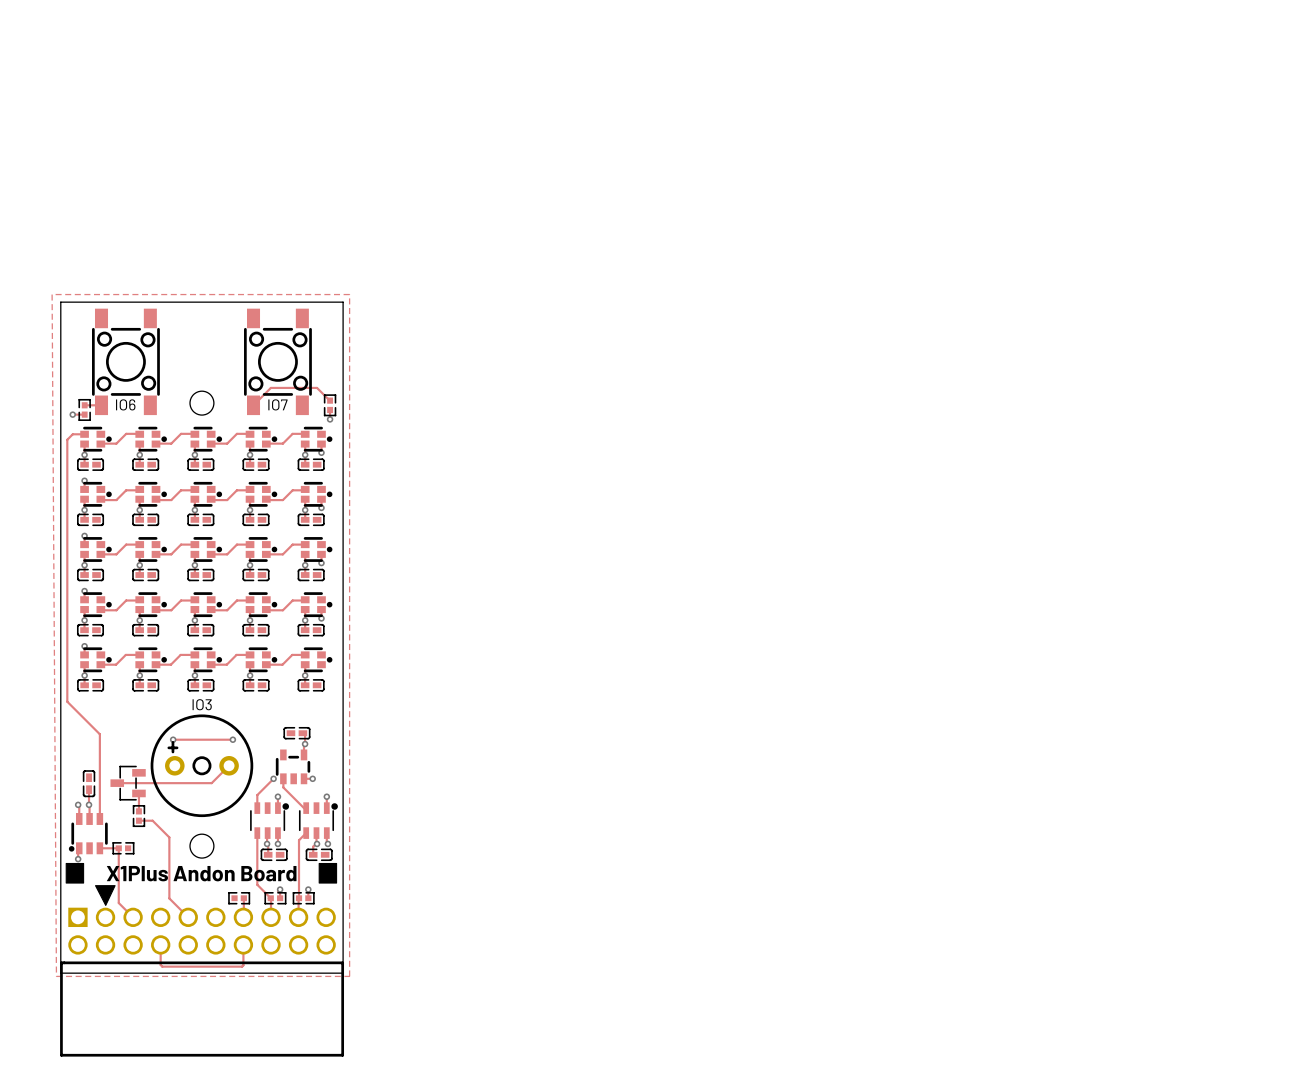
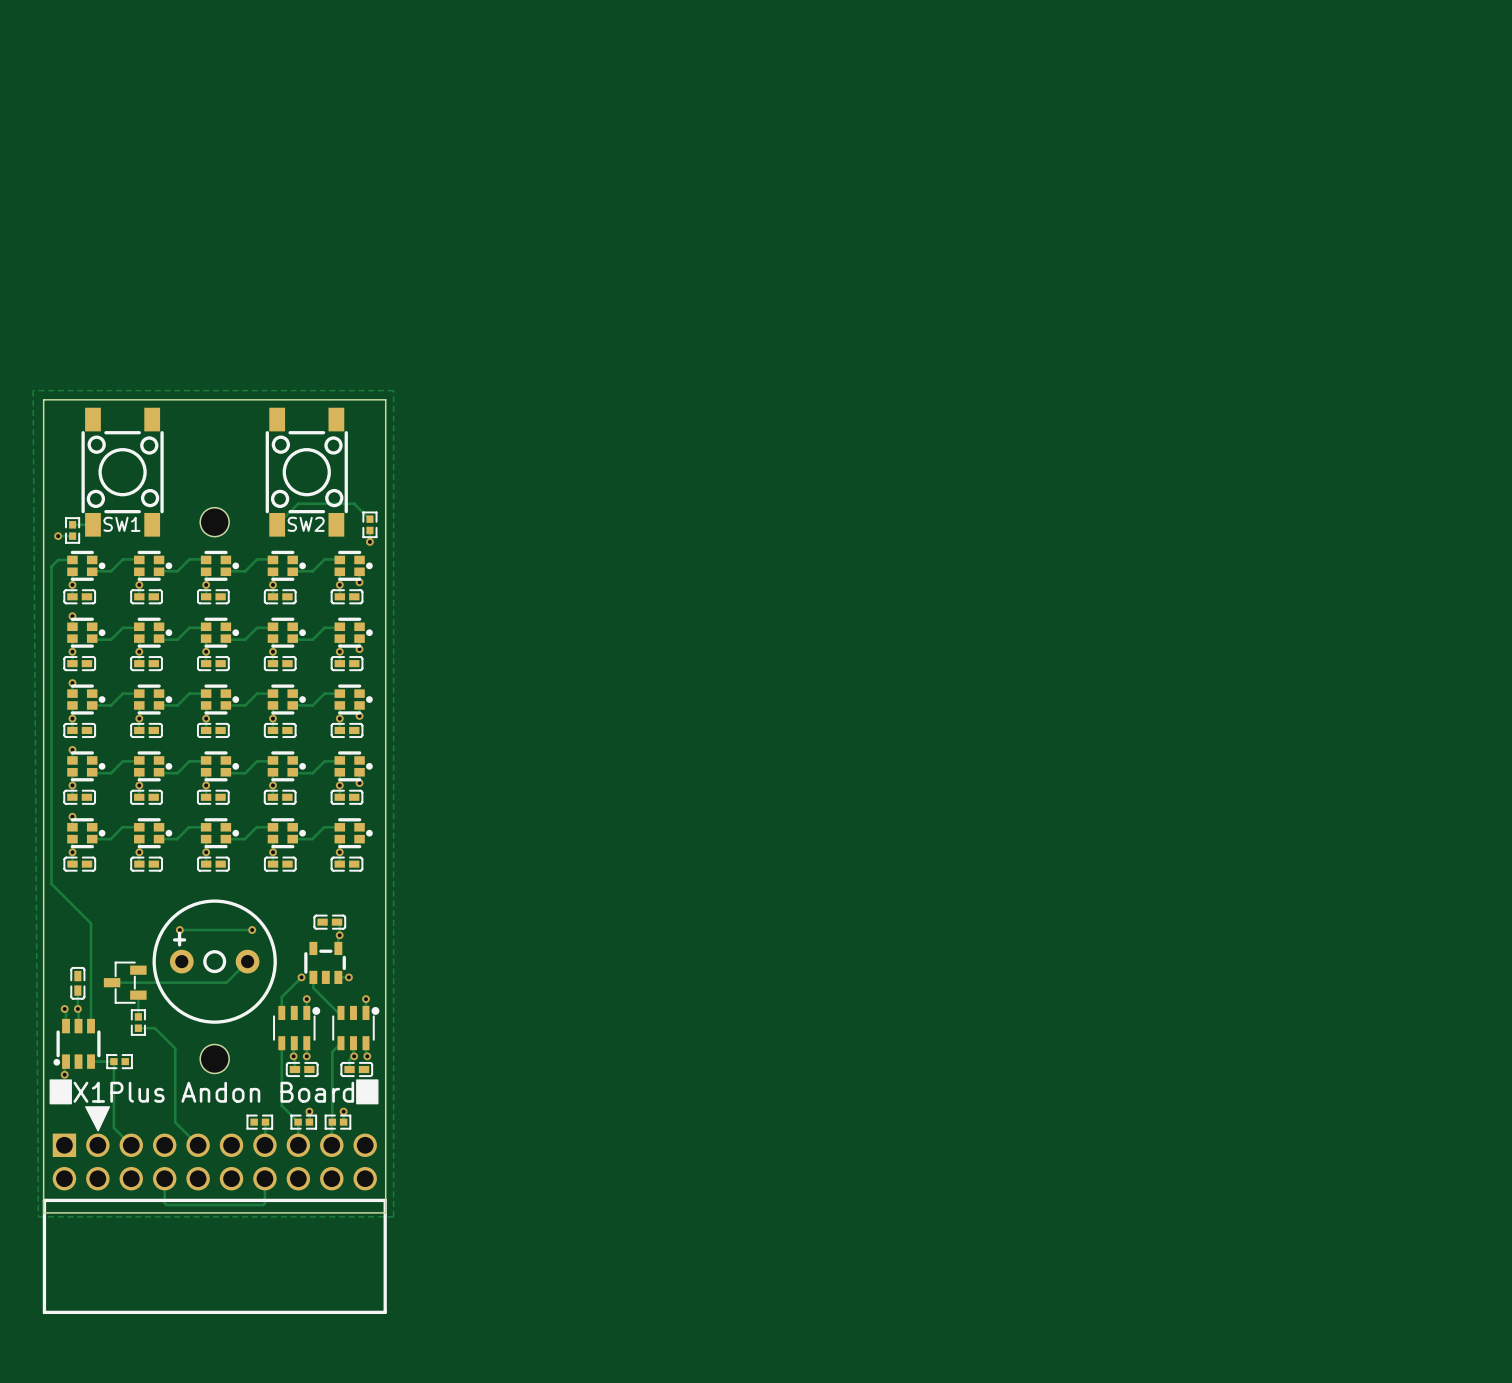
SW1 text: IO6 (125, 404) -> none
SW1 name: none -> SW1 (121, 524)
SW2 text: IO7 (277, 404) -> none
SW2 name: none -> SW2 (306, 524)
text: IO3 (202, 704) -> none

